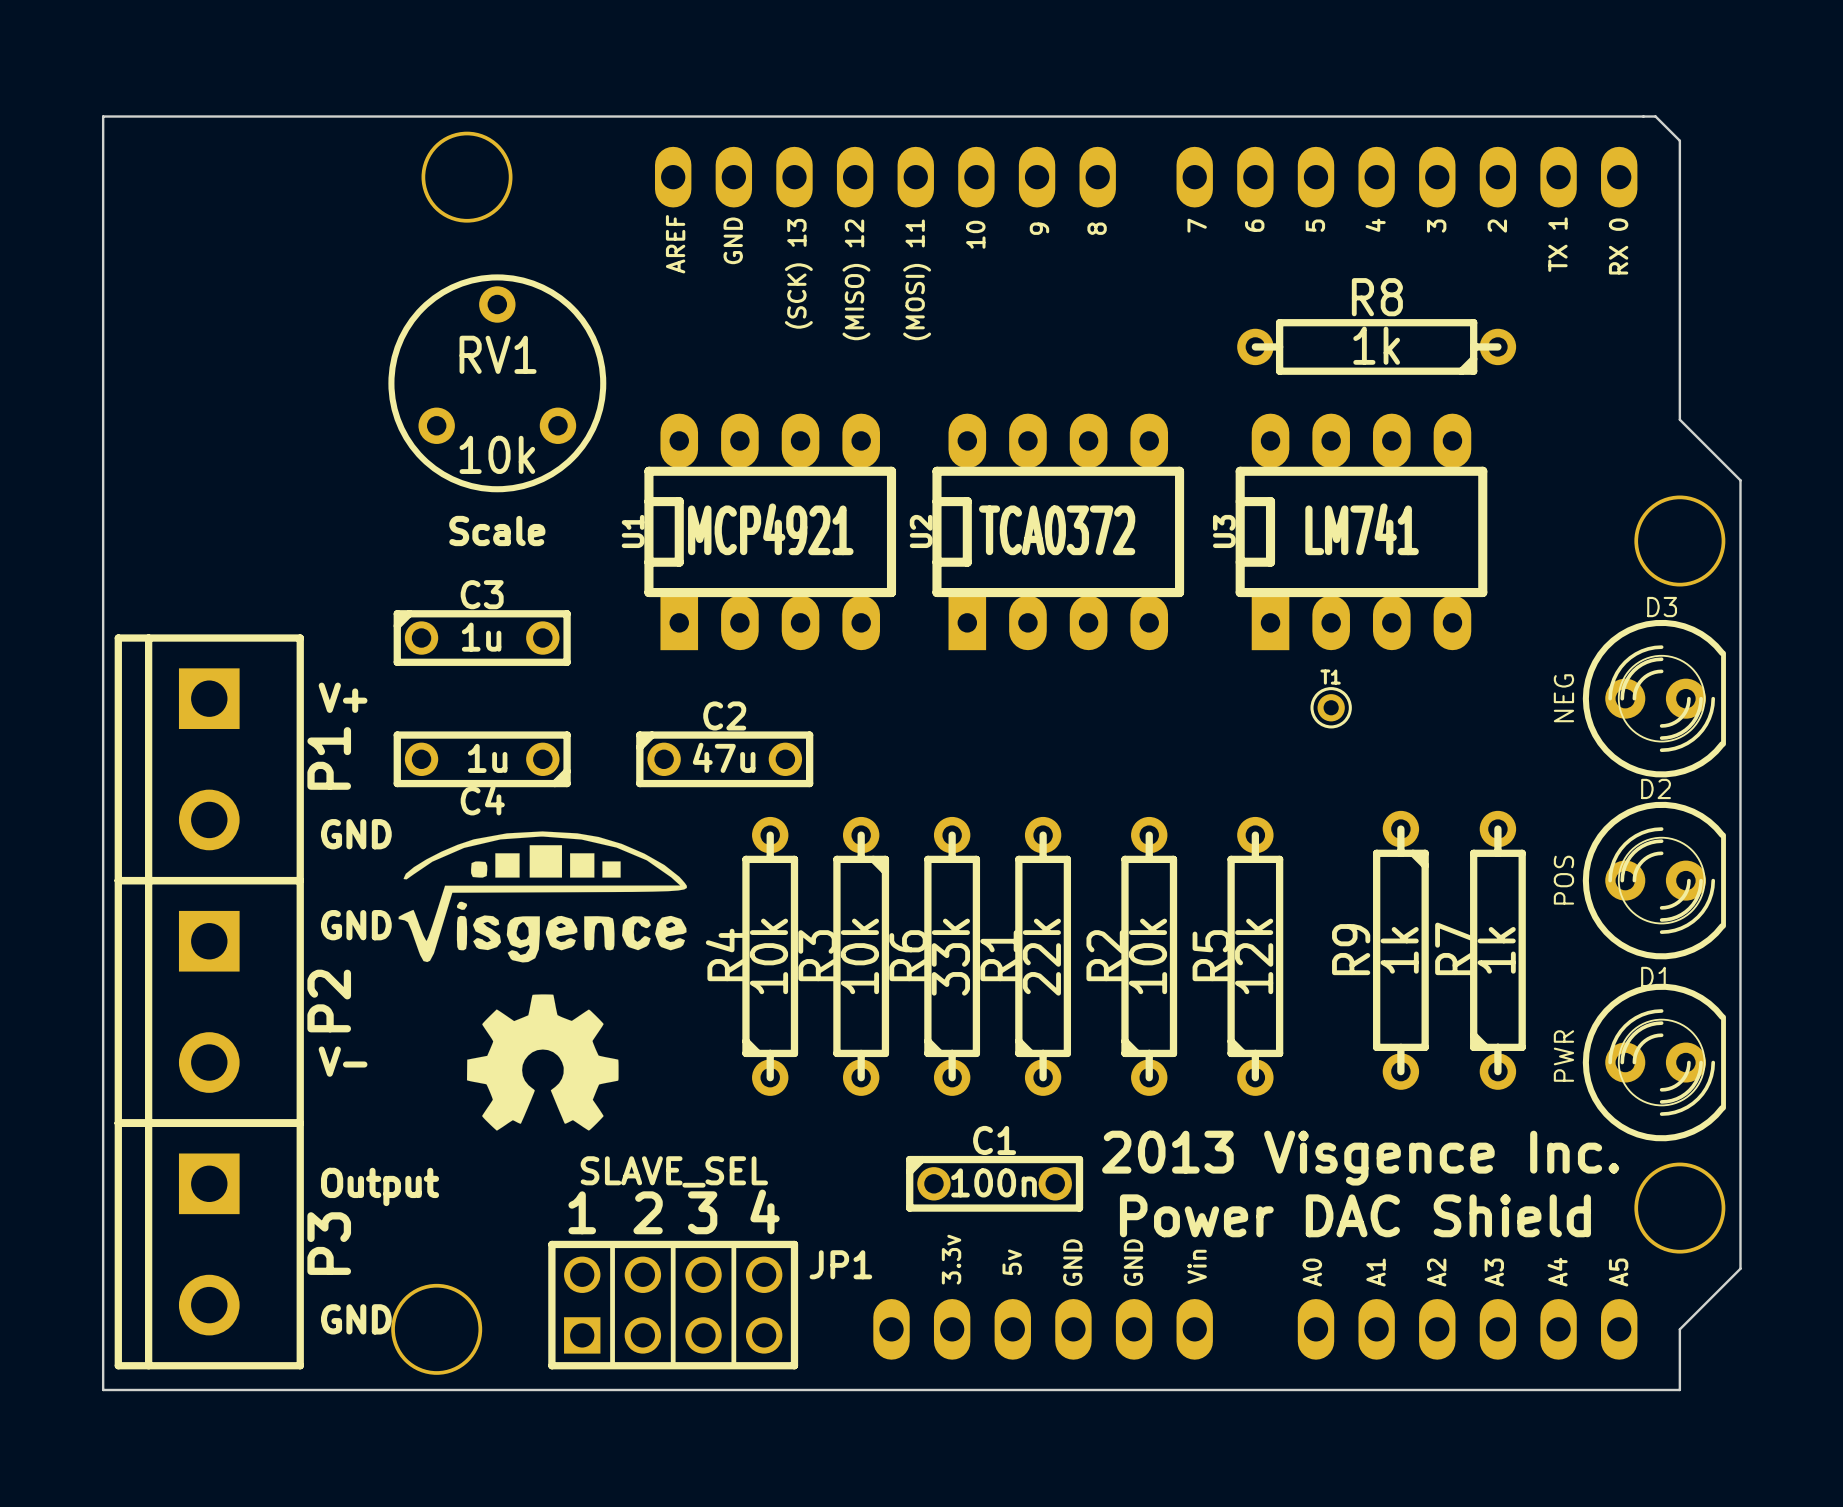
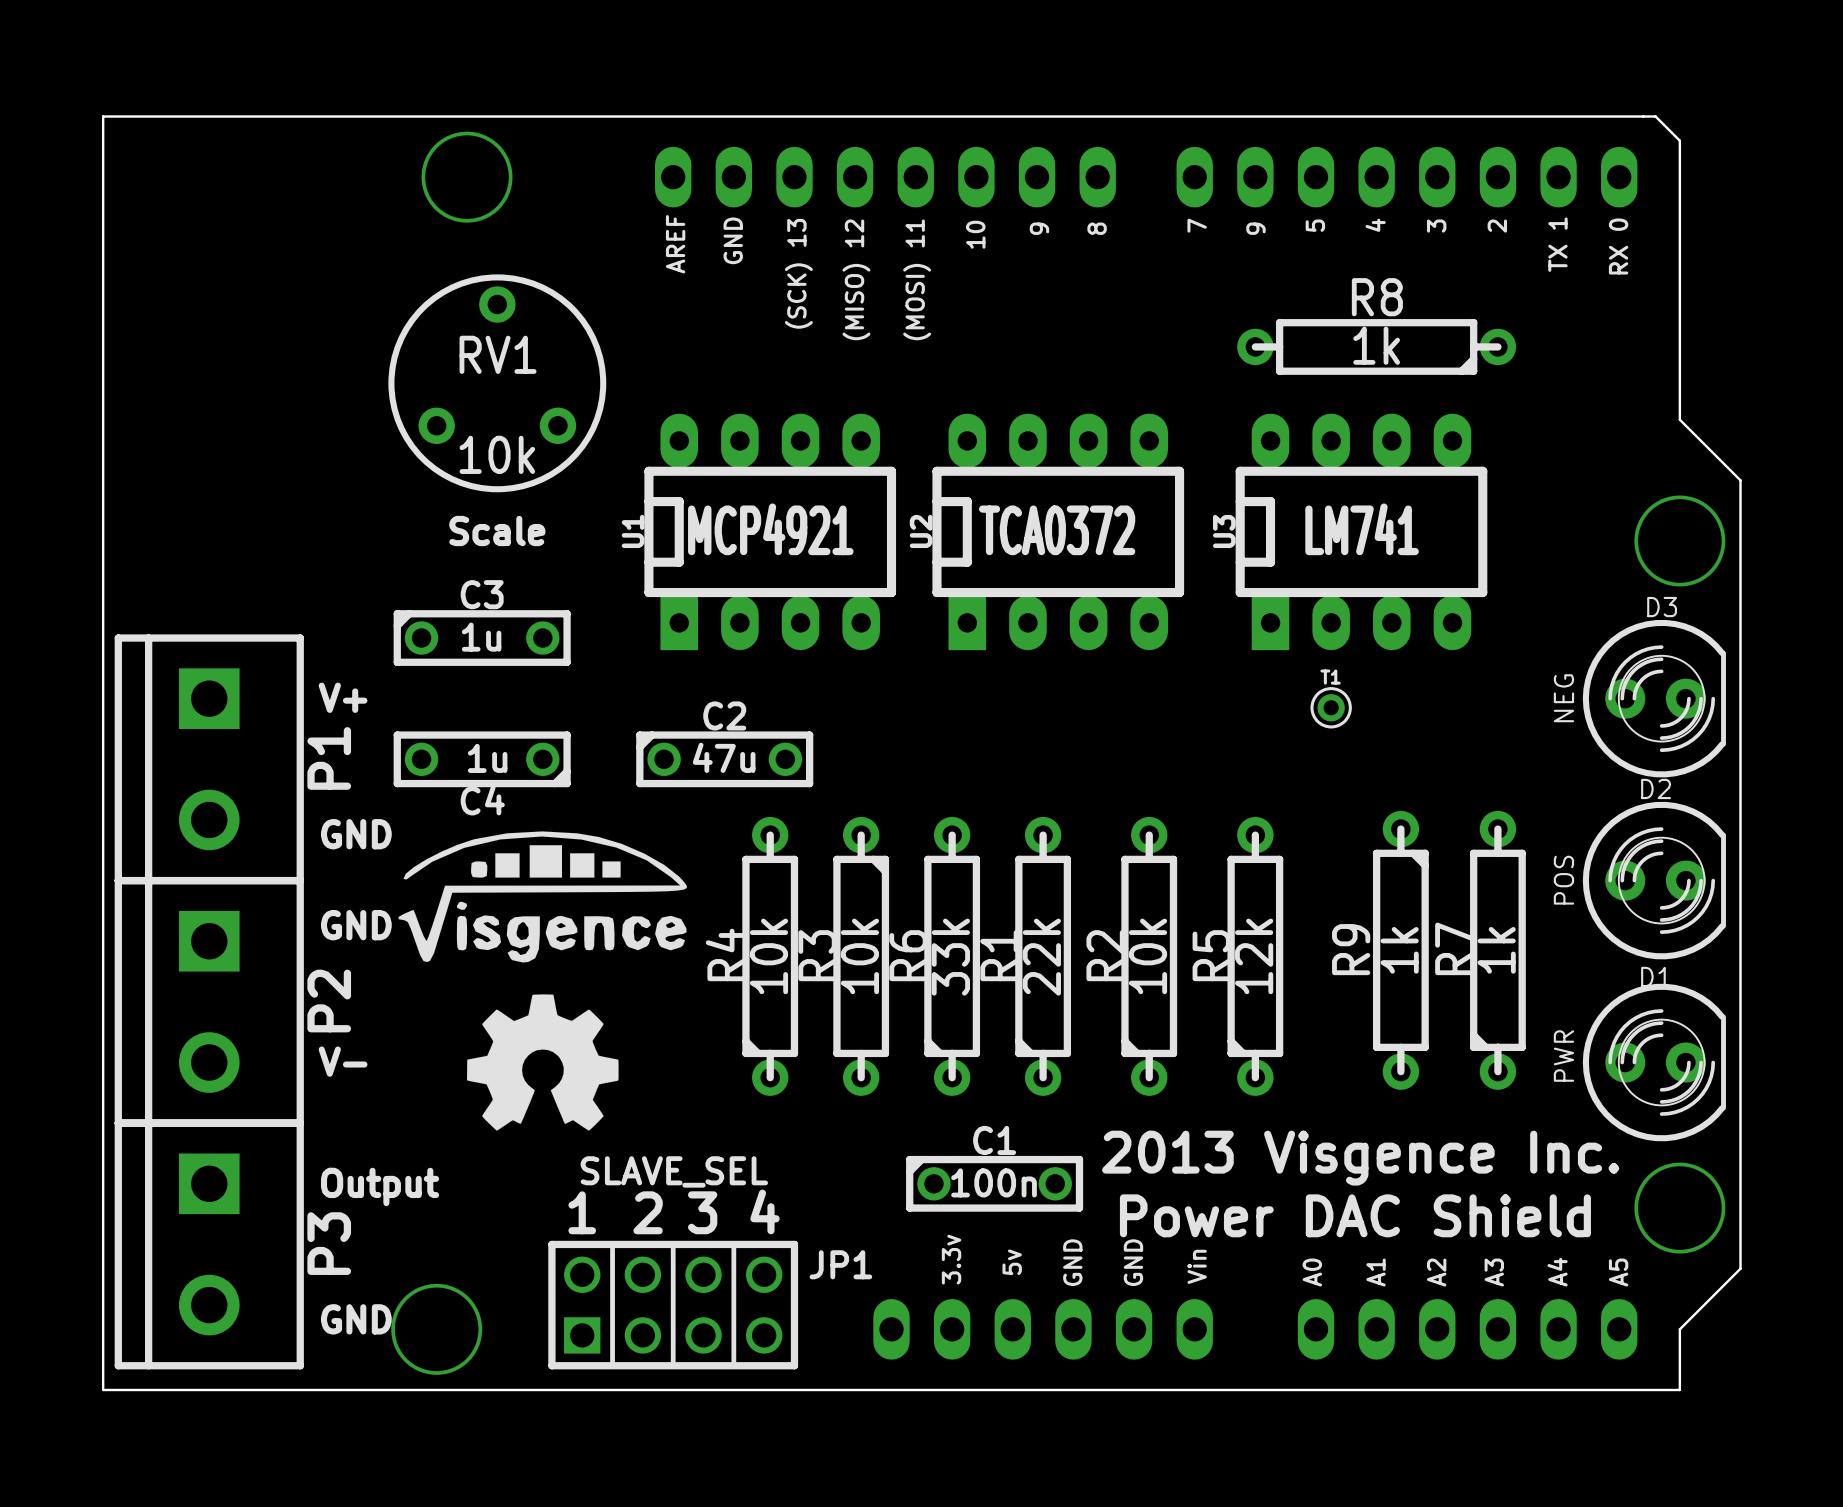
text rotation: 0° (1254, 225) -> 180° (1255, 228)

